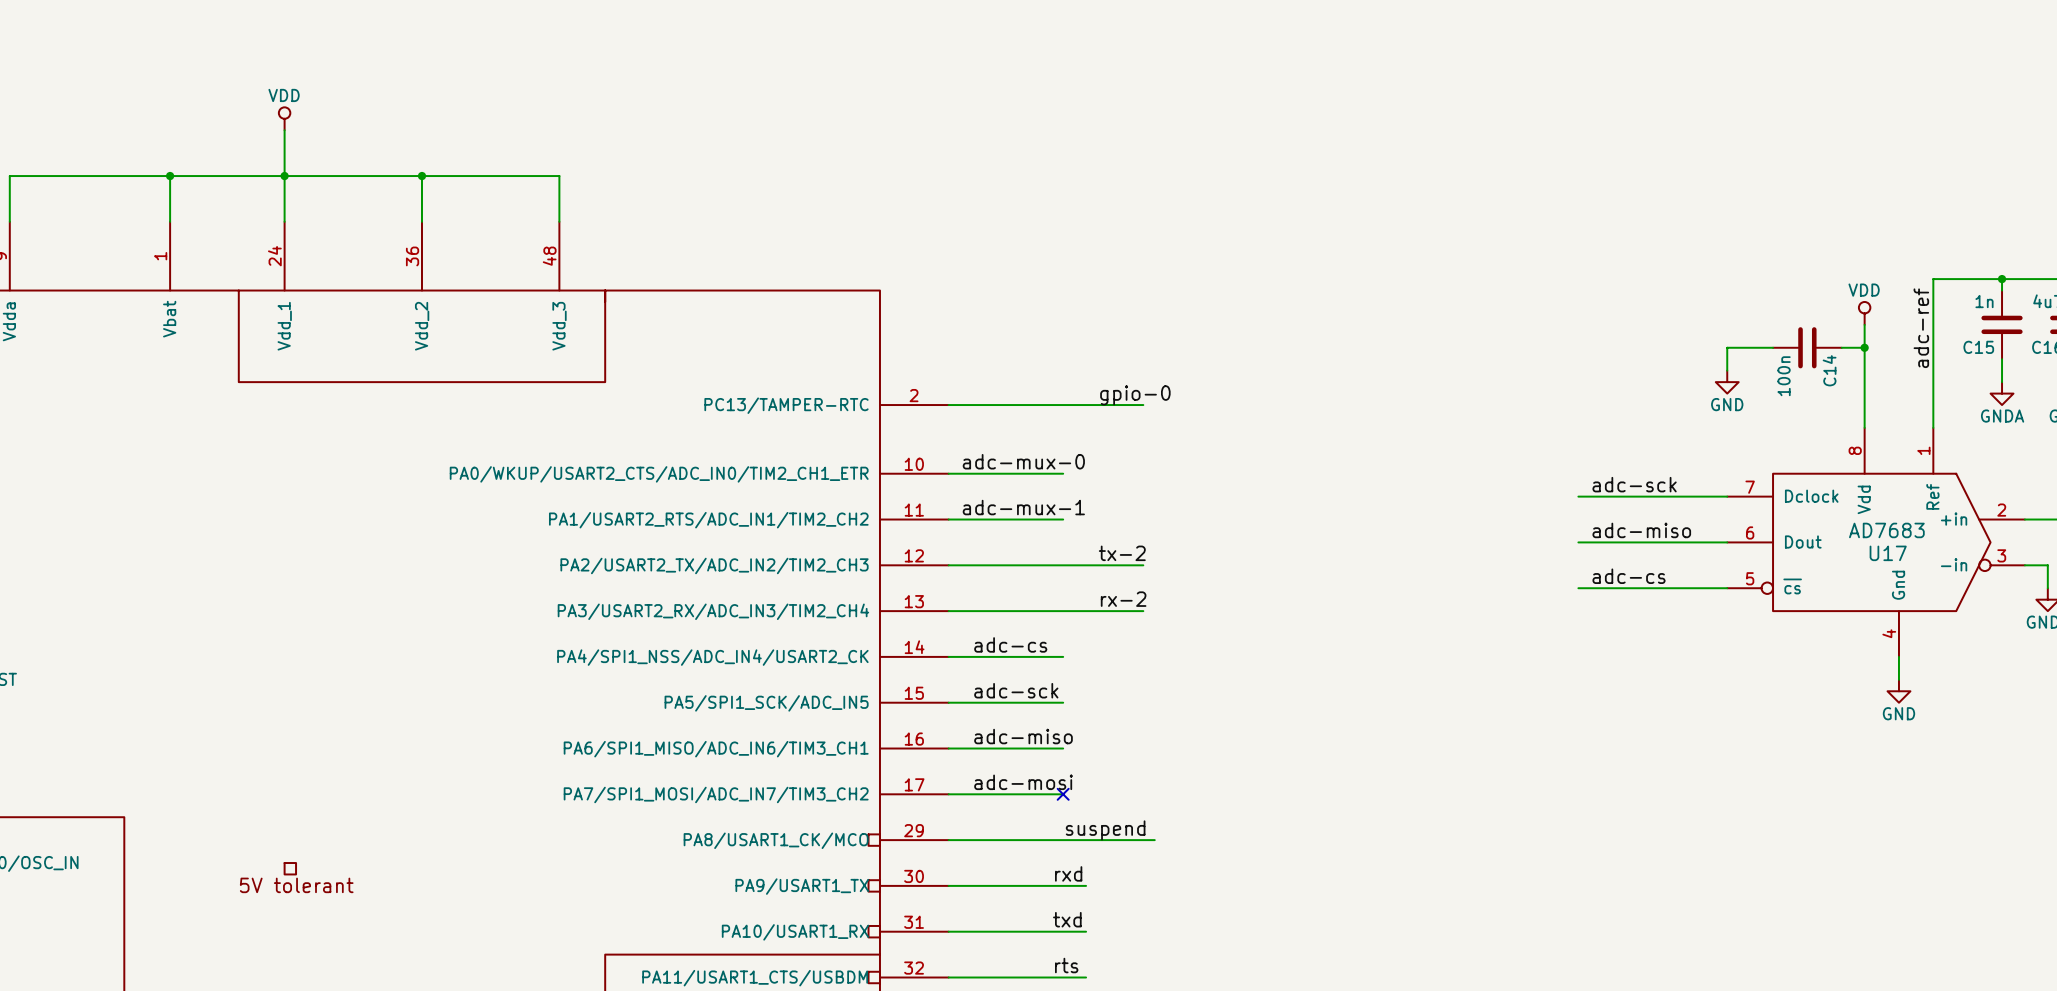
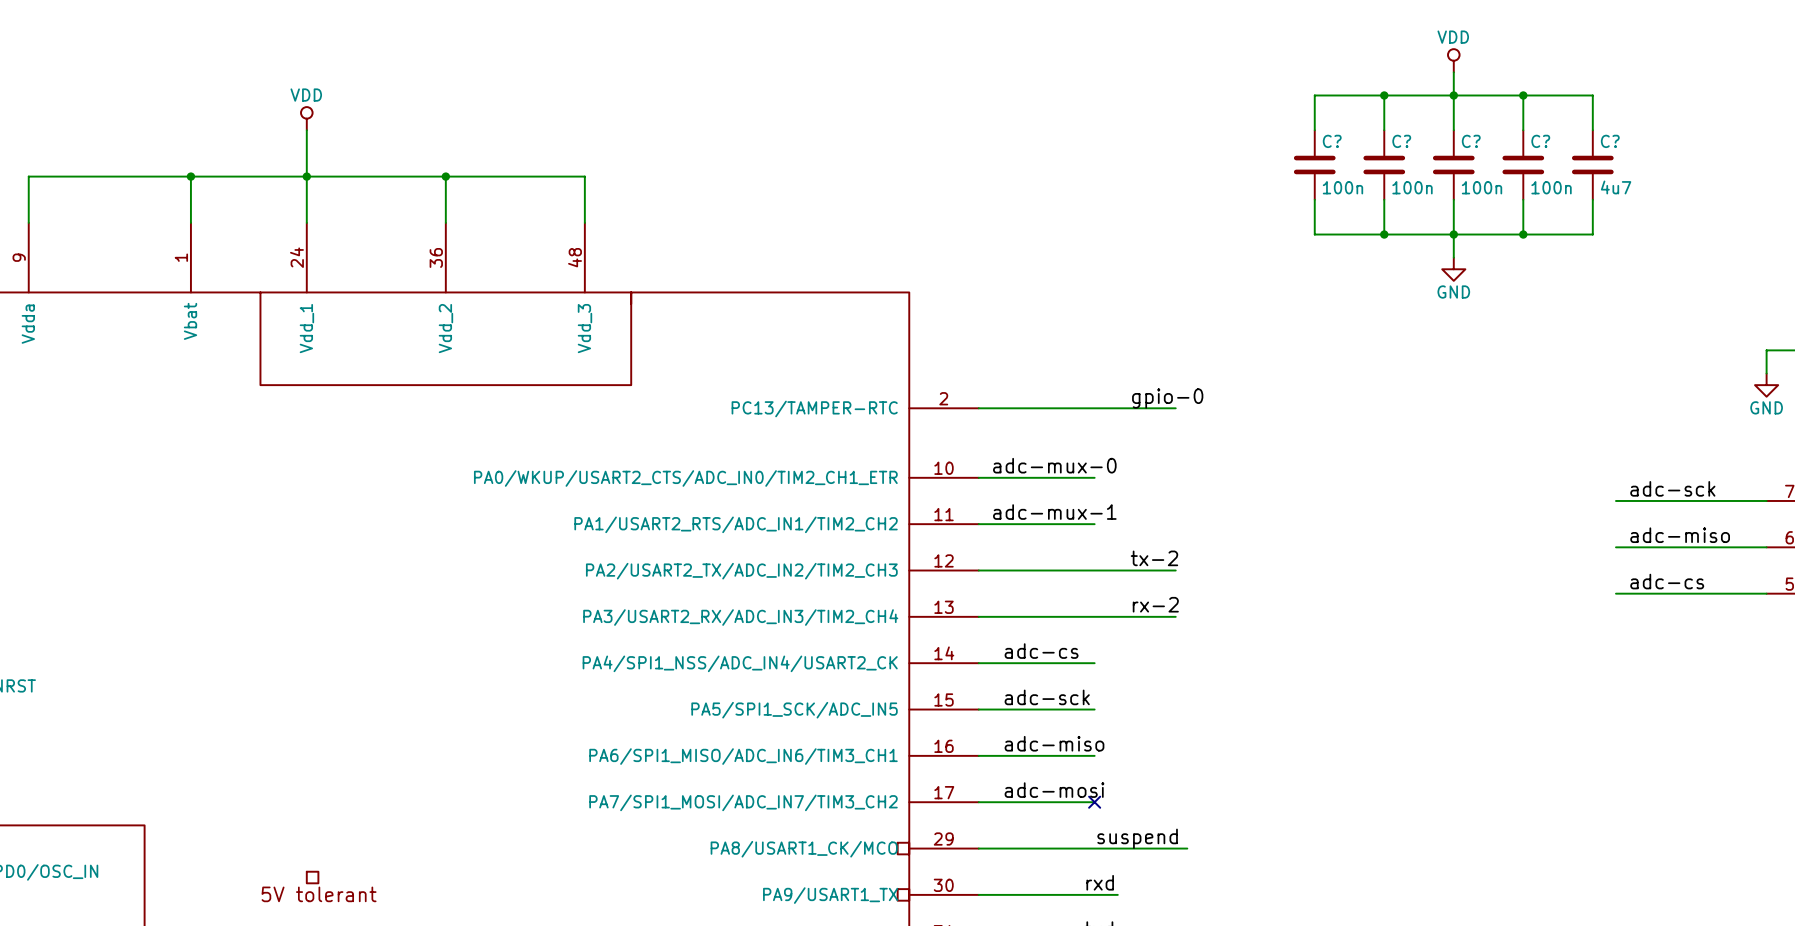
power symbol: none -> VDD (1453, 60)
wire: none -> (1453, 72) (1453, 130)
wire: none -> (1384, 95) (1384, 130)
junction: none -> (1384, 95)
junction: none -> (1453, 95)
wire: none -> (1523, 95) (1523, 130)
junction: none -> (1523, 95)
wire: none -> (1314, 130) (1314, 95) (1592, 95) (1592, 130)
C?: none -> 100n (1314, 165)
C?: none -> 100n (1384, 165)
C?: none -> 100n (1453, 165)
C?: none -> 100n (1523, 165)
C?: none -> 4u7 (1592, 165)
wire: none -> (1314, 199) (1314, 234) (1592, 234) (1592, 199)
wire: none -> (1384, 199) (1384, 234)
wire: none -> (1453, 199) (1453, 257)
wire: none -> (1523, 199) (1523, 234)
junction: none -> (1384, 234)
junction: none -> (1453, 234)
junction: none -> (1523, 234)
power symbol: none -> GND (1453, 269)

